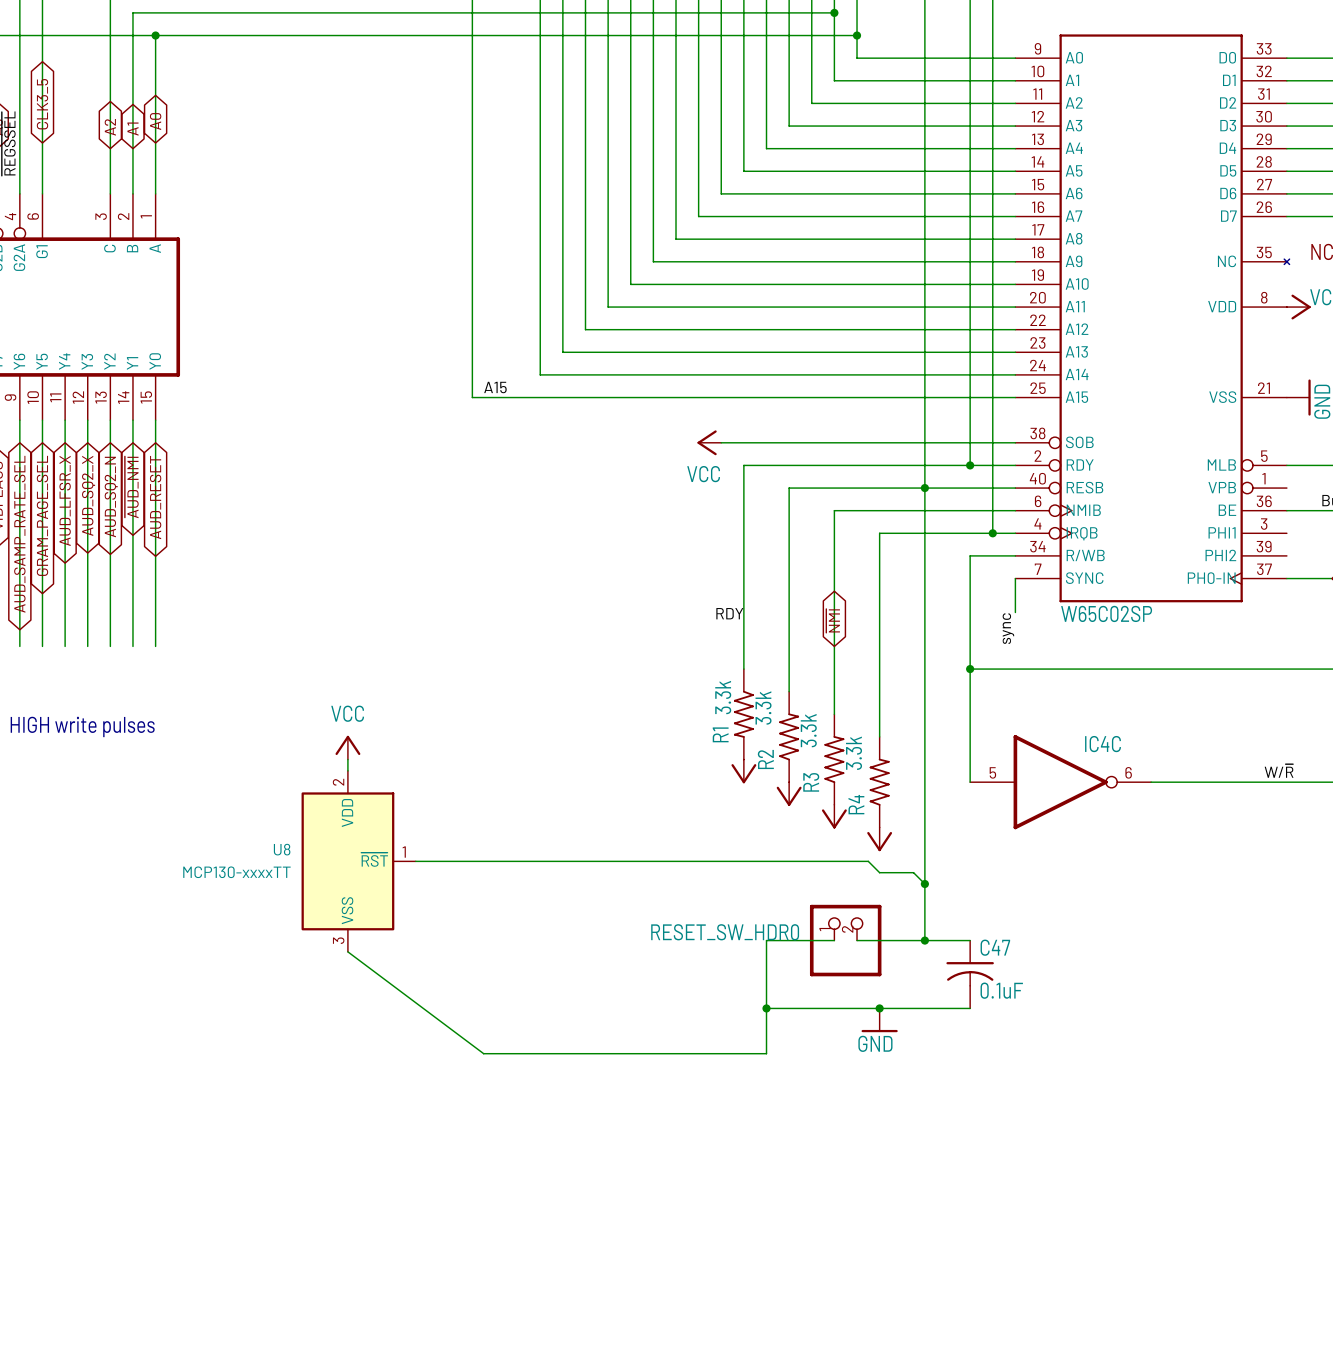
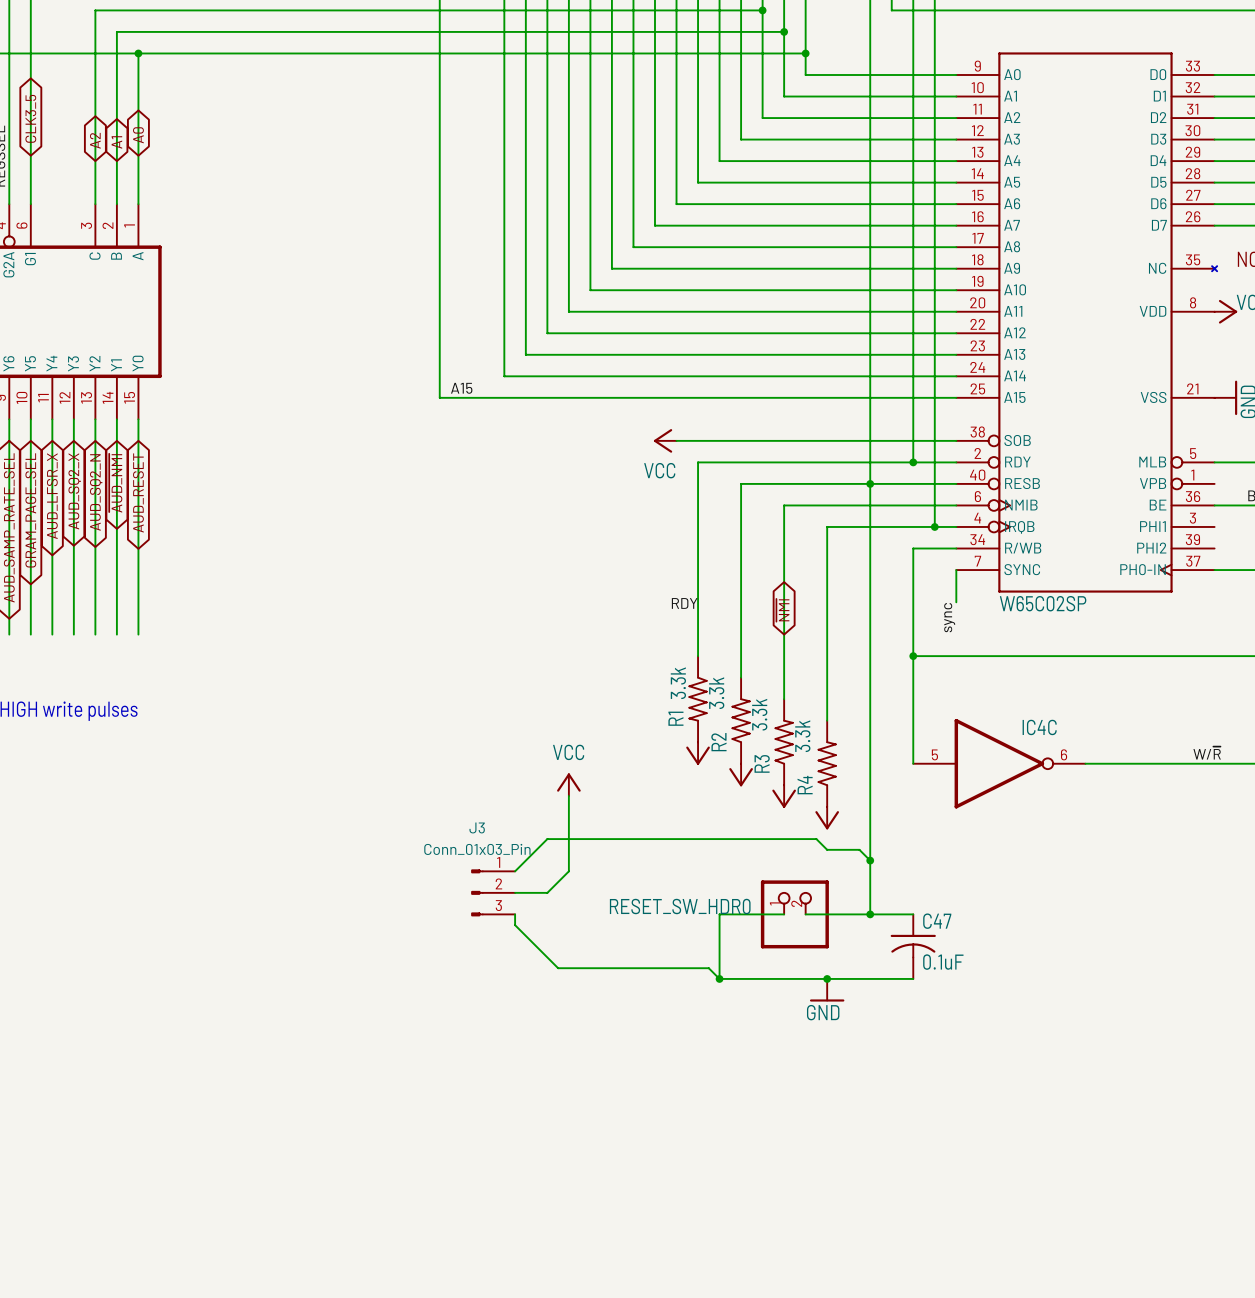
power symbol: VCC (347, 747) -> none
wire: (347, 759) (347, 770) -> none
power symbol: none -> VCC (568, 784)
wire: none -> (568, 796) (568, 871) (547, 892) (515, 892)
U8: MCP130-xxxxTT (358, 861) -> none
wire: (415, 861) (585, 861) -> (515, 871) (547, 839)
J3: none -> Conn_01x03_Pin (493, 892)
wire: (347, 951) (483, 1053) (766, 1053) (766, 1008) -> (515, 914) (515, 925) (558, 968) (708, 968) (719, 978)

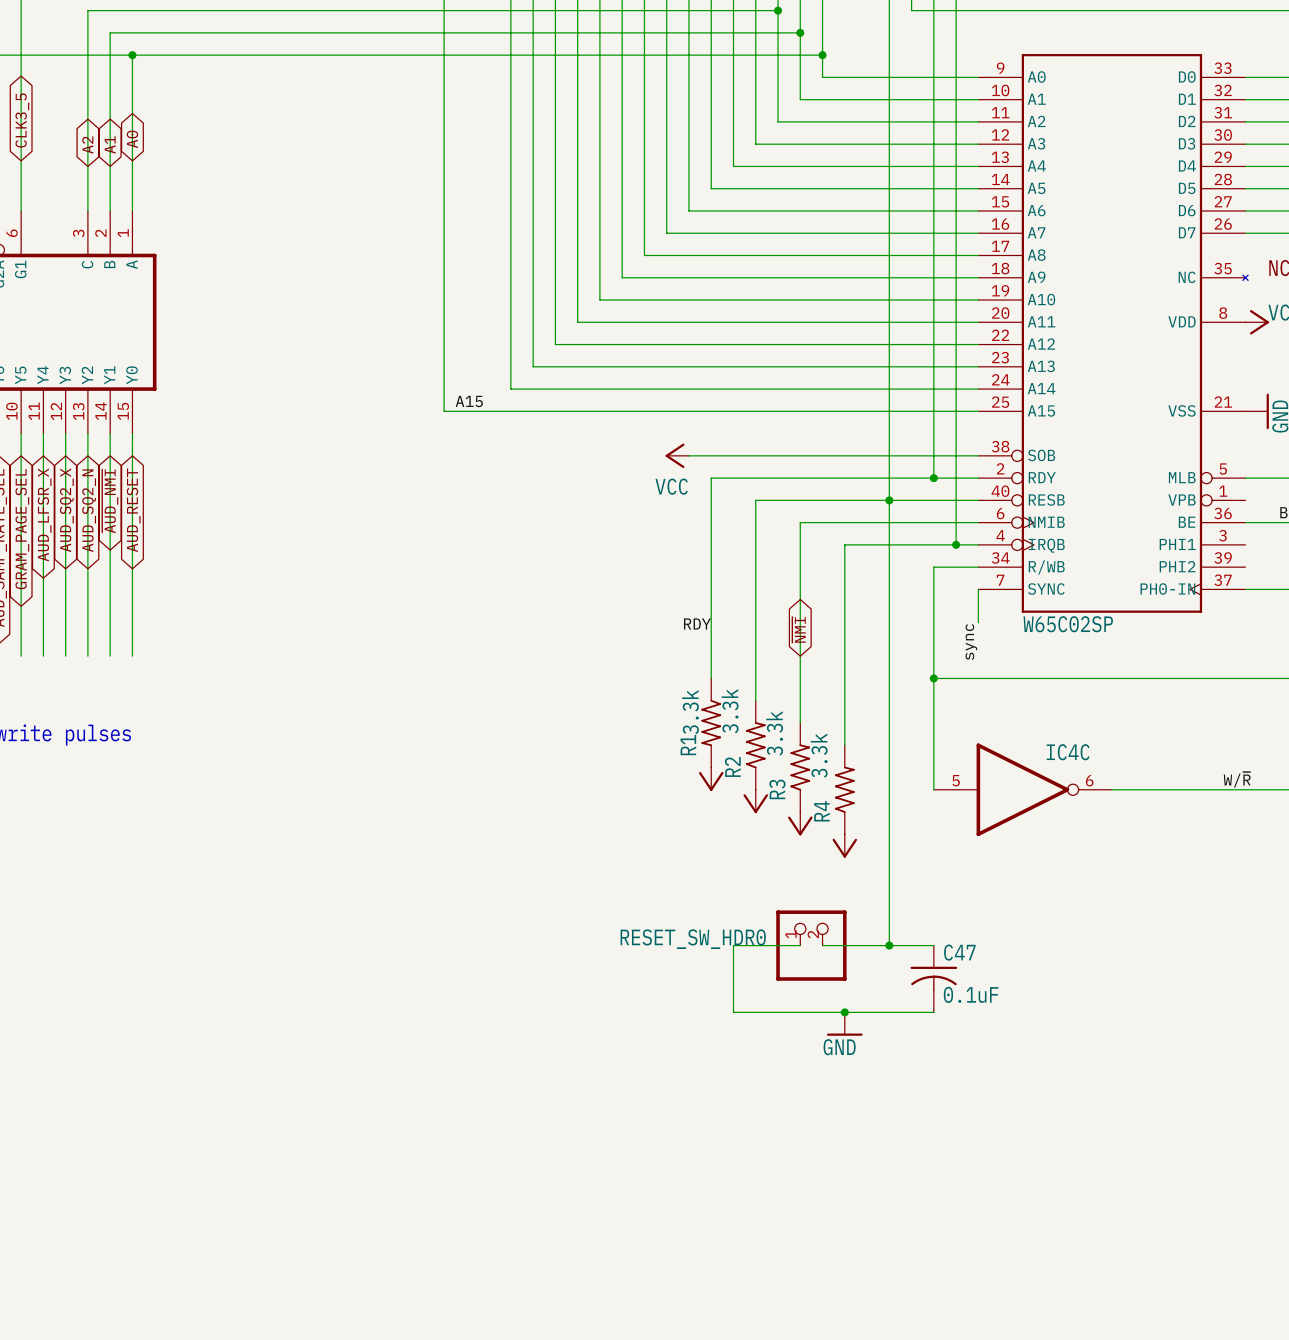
power symbol: VCC (568, 784) -> none
wire: (568, 796) (568, 871) (547, 892) (515, 892) -> none
wire: (870, 860) (859, 849) (827, 849) (816, 839) (547, 839) (515, 871) -> none
junction: (870, 860) -> none
J3: Conn_01x03_Pin (493, 892) -> none
wire: (515, 914) (515, 925) (558, 968) (708, 968) (719, 978) -> none
junction: (719, 978) -> none

